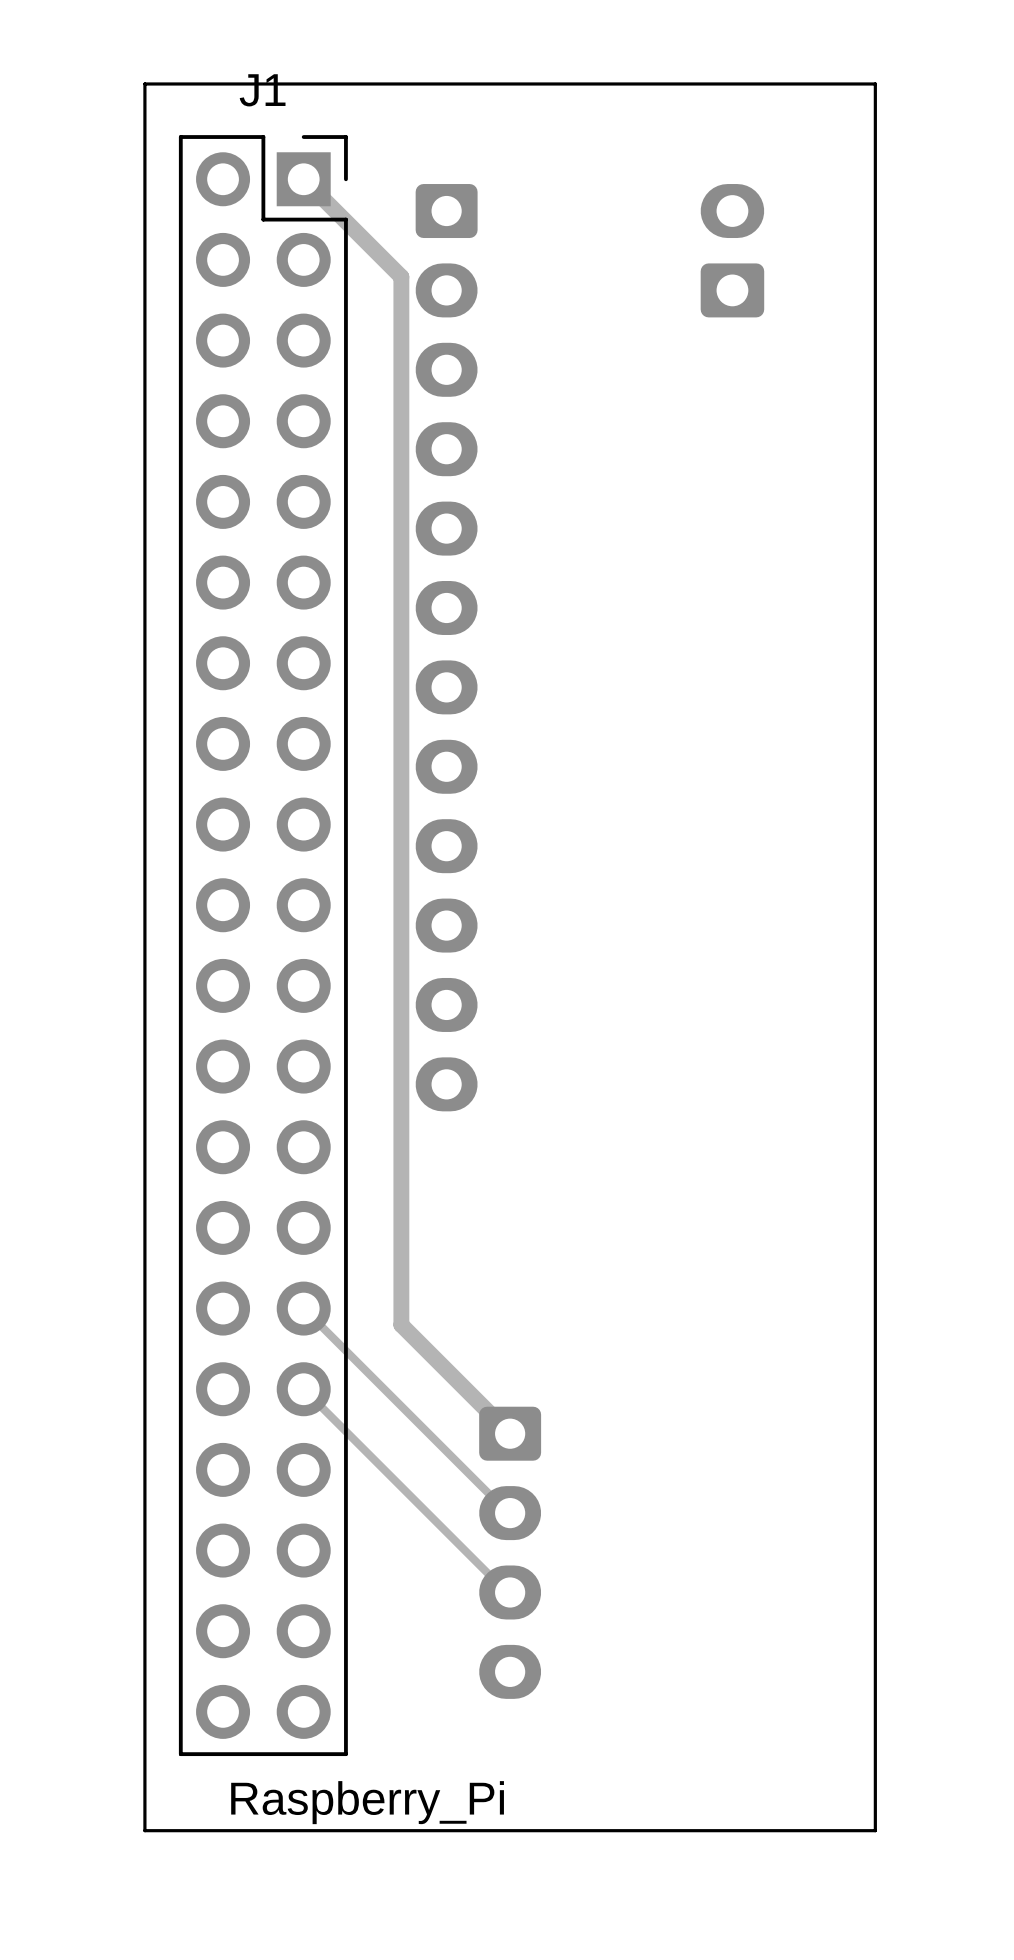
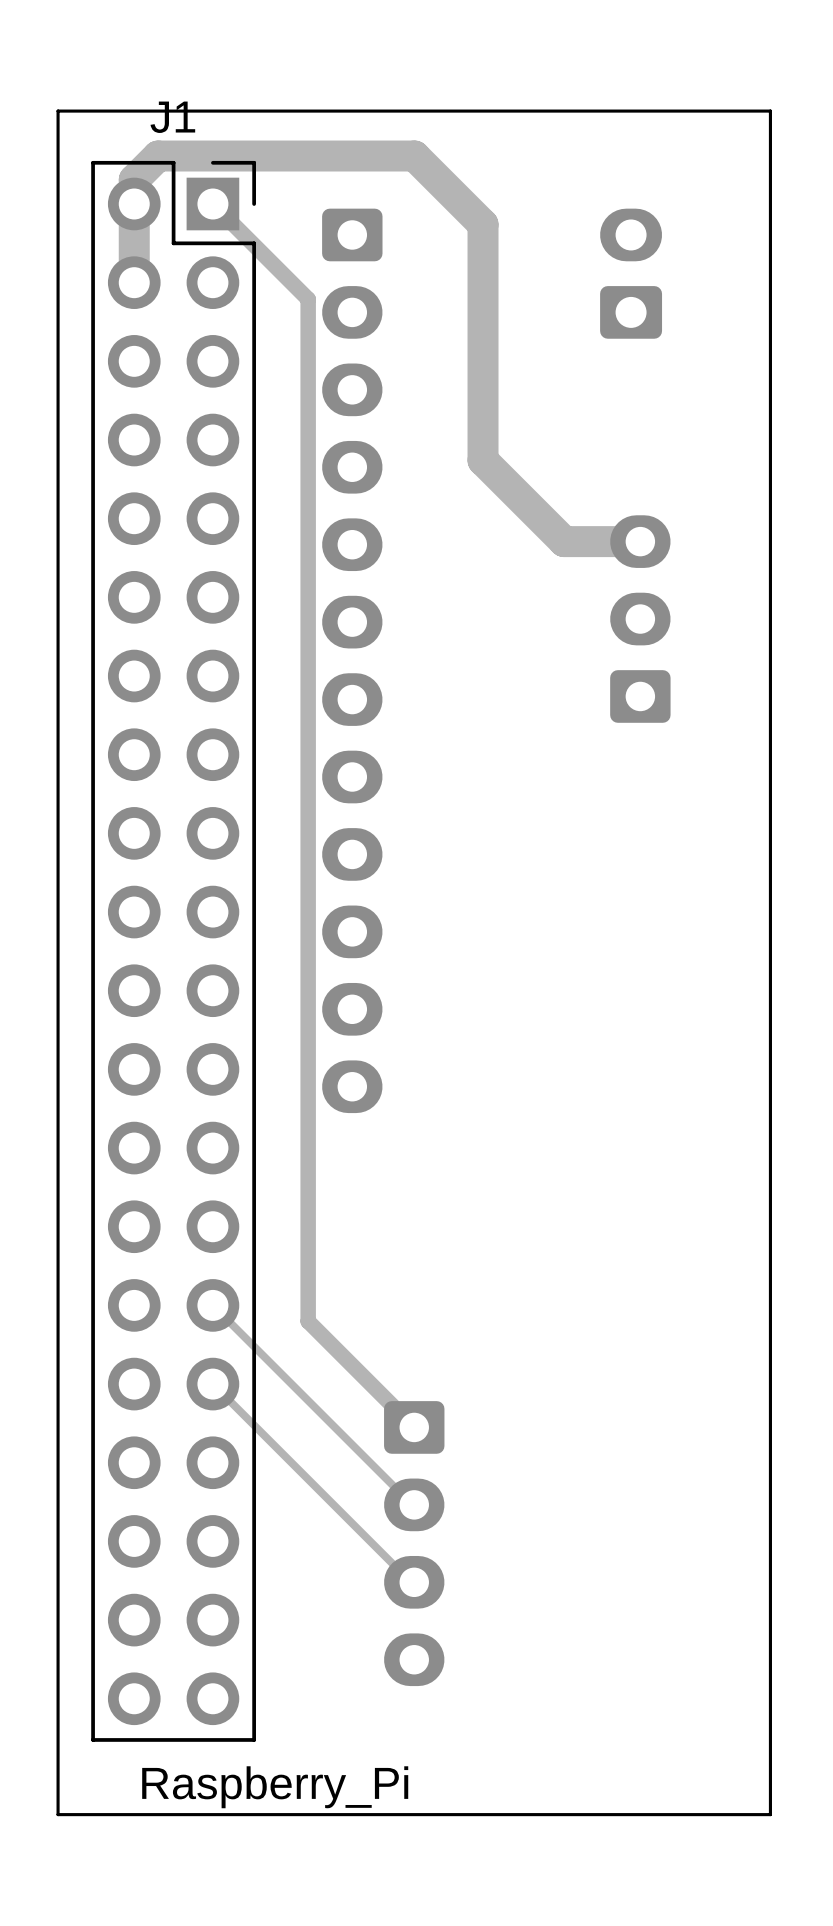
track: none -> (134, 282) (134, 179) (158, 156) (414, 156) (483, 224) (483, 460) (564, 541) (640, 541)
part: none -> (640, 619)

